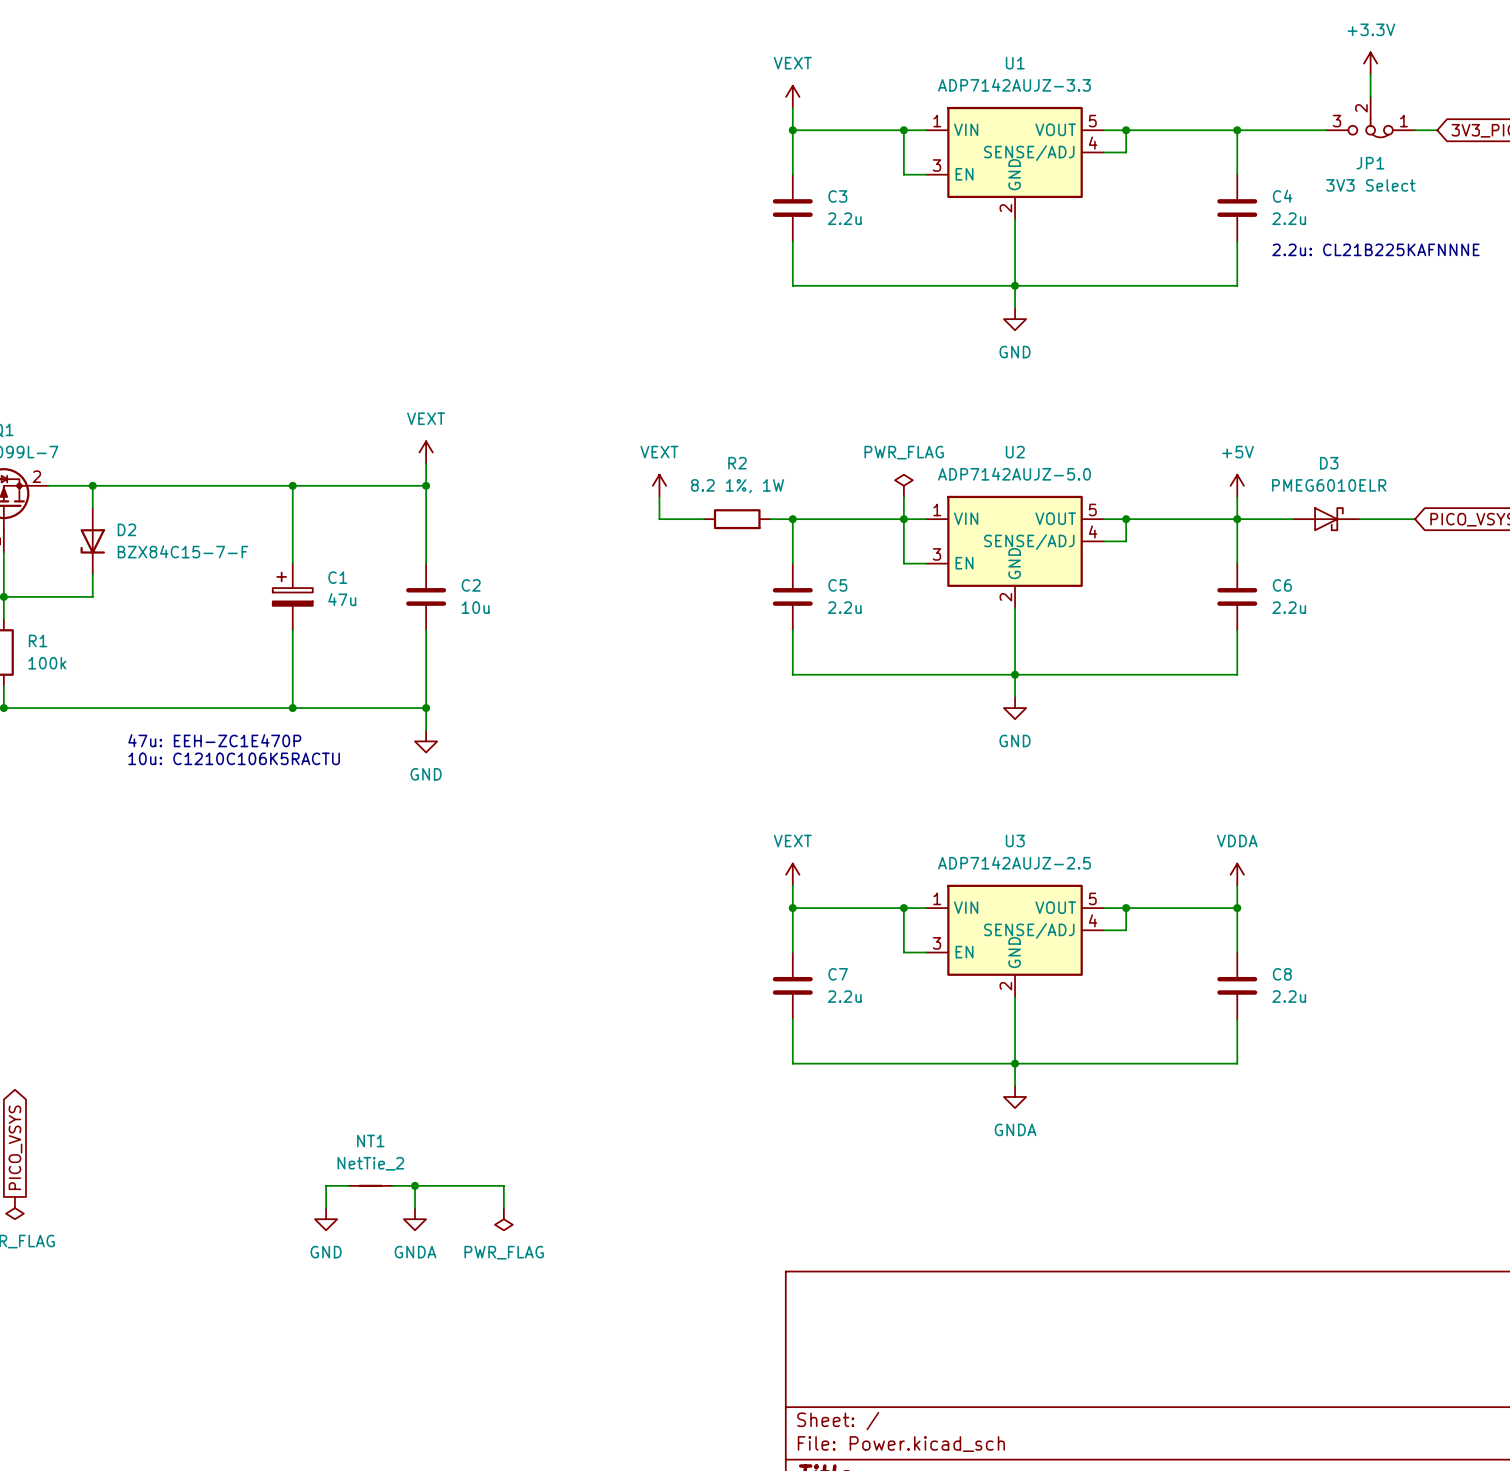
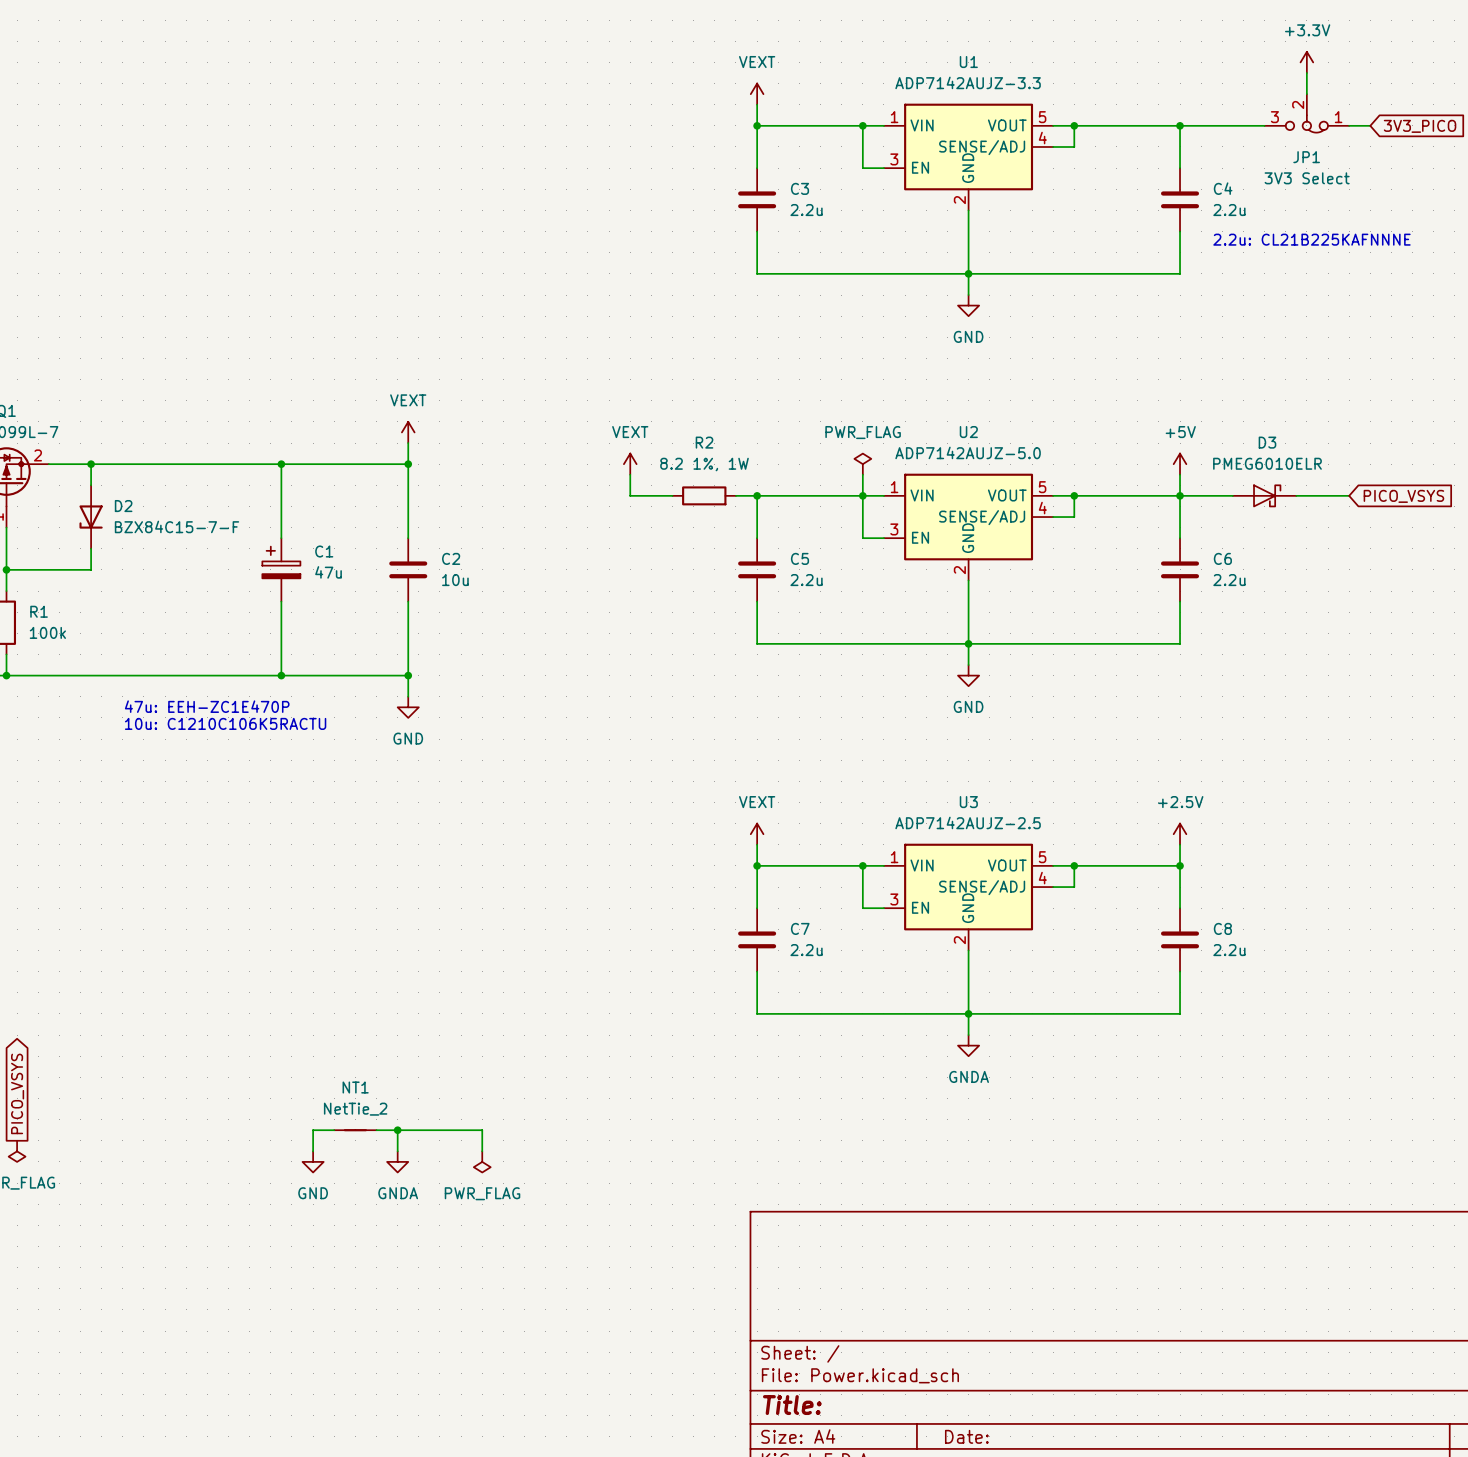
power symbol: VDDA (1237, 874) -> +2.5V (1180, 834)

